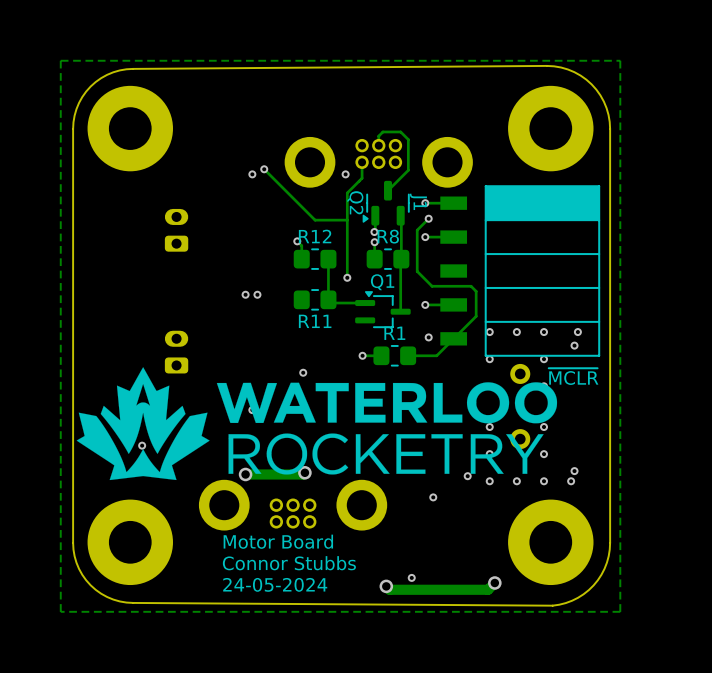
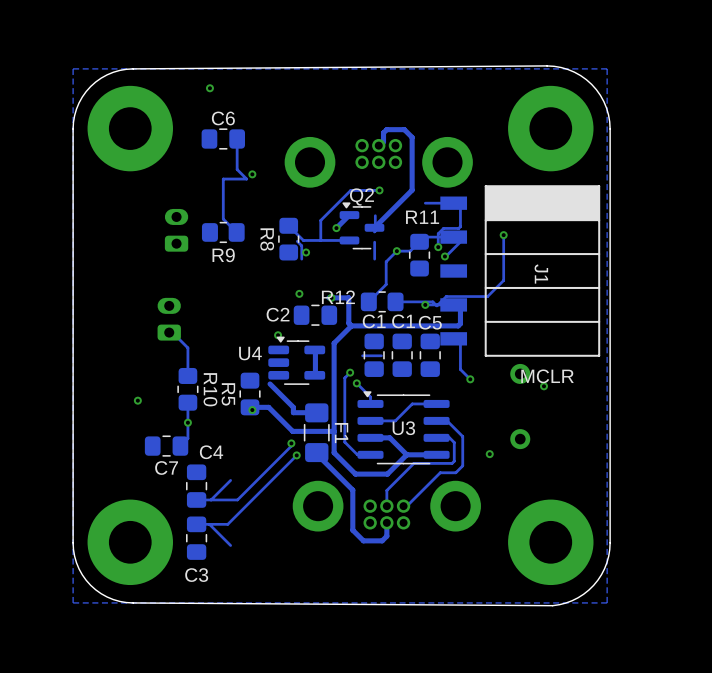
zone outline: (620, 60) (620, 611) (60, 611) (60, 60) (620, 60) -> (607, 68) (607, 602) (73, 602) (73, 68) (607, 68)
via: none -> (209, 88)
C6: none -> (223, 138)
track: none -> (237, 138) (237, 169) (246, 179) (223, 179) (223, 219) (236, 232)
track: none -> (383, 142) (383, 132) (386, 129) (404, 129) (412, 137) (412, 190) (374, 227)
track: (378, 145) (378, 136) (382, 131) (400, 131) (408, 139) (408, 170) (388, 190) -> none
track: (362, 162) (362, 178) (347, 193) (347, 277) -> none
track: (264, 169) (315, 220) (347, 220) -> none
via: (264, 169) -> none
via: (345, 174) -> none
track: none -> (379, 190) (350, 190) (320, 220) (320, 240)
via: none -> (379, 190)
J1 name position: J1 (418, 201) -> J1 (541, 274)
Q2 rotation: 0° (386, 203) -> 90° clockwise (361, 225)
Q2 position: (386, 203) -> (361, 225)
via: (425, 203) -> none
track: none -> (460, 208) (460, 226) (458, 228) (443, 228) (438, 233) (438, 247)
track: none -> (349, 215) (336, 228)
track: (400, 215) (400, 311) -> none
track: (428, 218) (417, 230) (417, 271) (432, 286) (471, 286) (476, 291) (476, 316) (436, 355) (408, 355) -> none
via: (428, 218) -> none
track: none -> (288, 225) (303, 240) (349, 240)
via: none -> (336, 228)
R9: none -> (223, 232)
via: (374, 232) -> none
track: none -> (503, 235) (503, 280) (487, 296) (446, 296) (436, 305) (432, 301) (395, 301)
via: none -> (503, 235)
R12 name position: R12 (315, 236) -> R12 (338, 297)
R8 name position: R8 (388, 236) -> R8 (267, 239)
via: (425, 237) -> none
via position: (297, 241) -> (306, 252)
track: none -> (419, 241) (410, 251) (396, 251) (386, 261) (386, 284) (368, 301)
track: none -> (460, 241) (444, 256)
via: (374, 242) -> none
via: none -> (438, 247)
via: none -> (396, 251)
via: none -> (444, 256)
R12 position: (315, 259) -> (382, 301)
track: (328, 259) (328, 299) (331, 303) (365, 303) -> none
R8 rotation: 0° (388, 259) -> 90° clockwise (288, 239)
R8 position: (388, 259) -> (288, 239)
via: (347, 277) -> none
via: none -> (299, 293)
via: (245, 294) -> none
via: (257, 294) -> none
track: none -> (328, 297) (348, 297) (348, 323) (351, 325)
via: none -> (331, 297)
R11 rotation: 0° (315, 299) -> 90° clockwise (419, 255)
R11 position: (315, 299) -> (419, 255)
Q1: (382, 309) -> none
track: none -> (460, 309) (460, 323) (458, 325) (351, 325)
C2: none -> (315, 315)
R11 name position: R11 (315, 321) -> R11 (422, 217)
track: none -> (351, 325) (334, 343) (334, 452) (355, 474) (387, 474) (406, 454)
track: none -> (169, 329) (187, 347) (187, 375)
via: (489, 332) -> none
via: (516, 332) -> none
via: (544, 332) -> none
via: (577, 332) -> none
via: none -> (278, 335)
via: (428, 337) -> none
track: none -> (460, 343) (460, 369) (470, 379)
via: (574, 345) -> none
track: none -> (314, 349) (314, 375)
part position: (176, 352) -> (169, 319)
via: (362, 355) -> none
C1: none -> (374, 355)
R1: (394, 355) -> none
C1: none -> (402, 355)
C5: none -> (430, 355)
via: (489, 359) -> none
via: (544, 359) -> none
U4: none -> (296, 360)
drawing: [76, 367, 558, 481] -> none
via: (303, 372) -> none
track: none -> (350, 372) (344, 377) (344, 442) (357, 454) (370, 454)
via: none -> (350, 372)
text: ~{MCLR} (573, 376) -> MCLR (547, 376)
via: none -> (470, 379)
track: none -> (270, 383) (293, 407) (293, 412) (316, 412)
track: none -> (356, 383) (370, 397) (370, 403)
via: none -> (356, 383)
R10: none -> (187, 389)
R5: none -> (250, 394)
via: none -> (137, 400)
track: none -> (187, 402) (187, 438) (180, 446)
track: none -> (436, 403) (412, 403) (395, 420) (370, 420)
track: none -> (250, 407) (268, 407) (292, 431) (334, 431)
track: none -> (436, 420) (447, 420) (462, 436) (462, 465) (455, 472) (440, 472) (406, 506) (403, 506)
via: none -> (187, 422)
U3: none -> (403, 427)
via: (489, 427) -> none
via: (544, 427) -> none
F1: none -> (316, 432)
track: none -> (370, 437) (389, 437) (406, 454)
track: none -> (436, 437) (449, 437) (454, 442) (454, 461) (452, 463) (413, 463) (386, 490) (386, 506)
track: none -> (291, 443) (291, 446) (237, 499) (196, 499)
via: none -> (291, 443)
via: (142, 445) -> none
C7: none -> (166, 446)
track: none -> (316, 452) (352, 490) (352, 530) (363, 540) (382, 540) (386, 536) (386, 522)
track: none -> (436, 454) (406, 454)
via: (544, 454) -> none
track: none -> (296, 455) (227, 524) (196, 524)
via: none -> (296, 455)
via: (574, 471) -> none
track: (304, 472) (303, 474) (245, 474) -> none
via: (304, 472) -> none
via: (245, 474) -> none
via: (467, 476) -> none
track: none -> (230, 480) (211, 499)
via: (489, 481) -> none
via: (516, 481) -> none
via: (544, 481) -> none
via: (571, 481) -> none
C4: none -> (196, 486)
via: (433, 497) -> none
part position: (293, 505) -> (386, 506)
track: none -> (209, 524) (230, 545)
C3: none -> (196, 538)
text: Motor Board (278, 541) -> none
text: Connor Stubbs (289, 563) -> none
via: (411, 577) -> none
track: (494, 583) (488, 589) (389, 589) (386, 586) -> none
via: (494, 583) -> none
text: 24-05-2024 (275, 584) -> none
via: (386, 586) -> none

